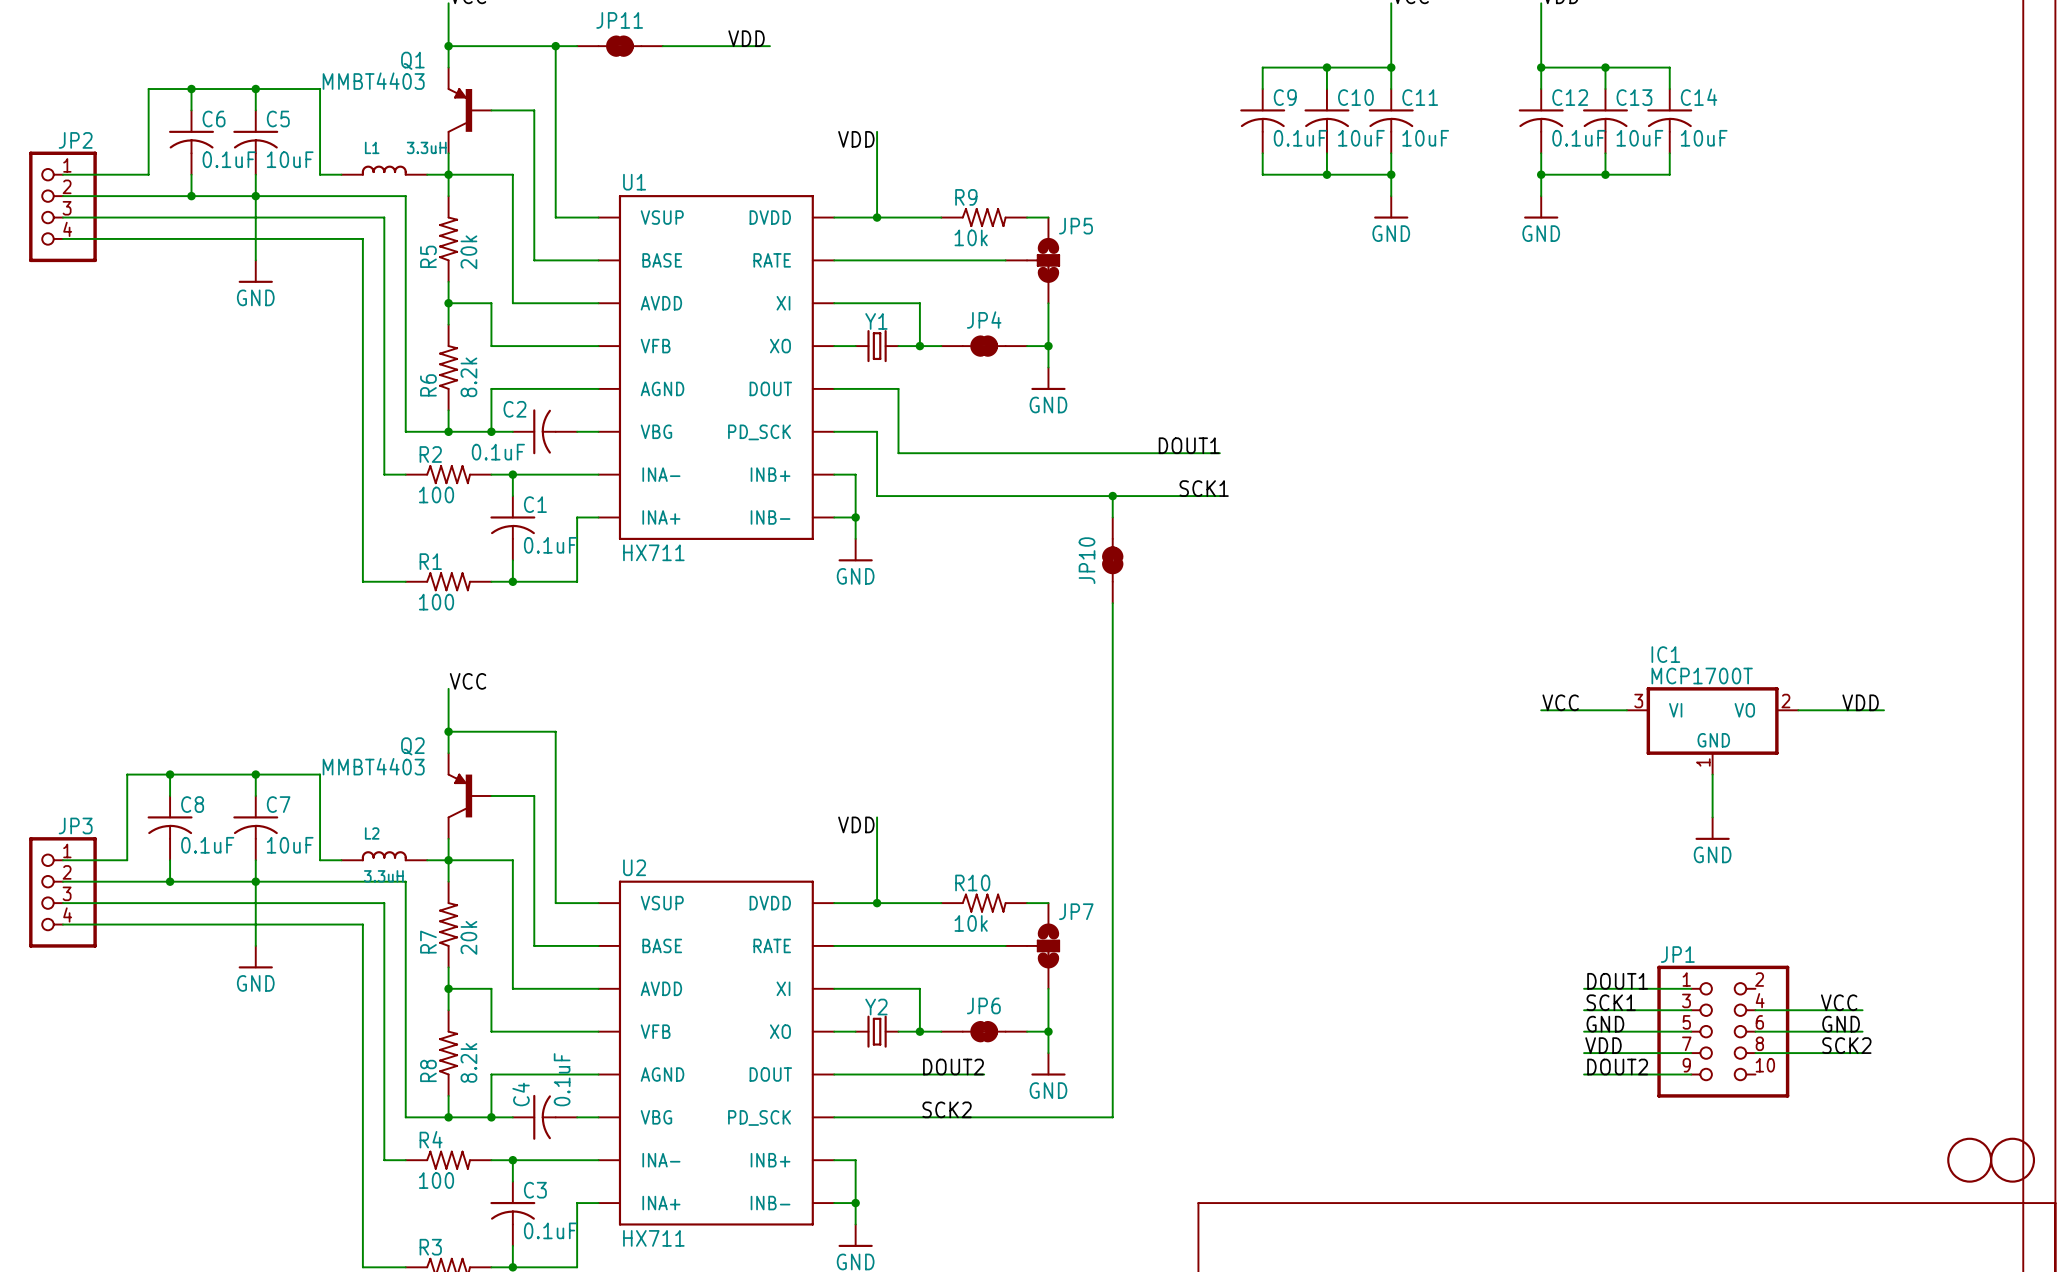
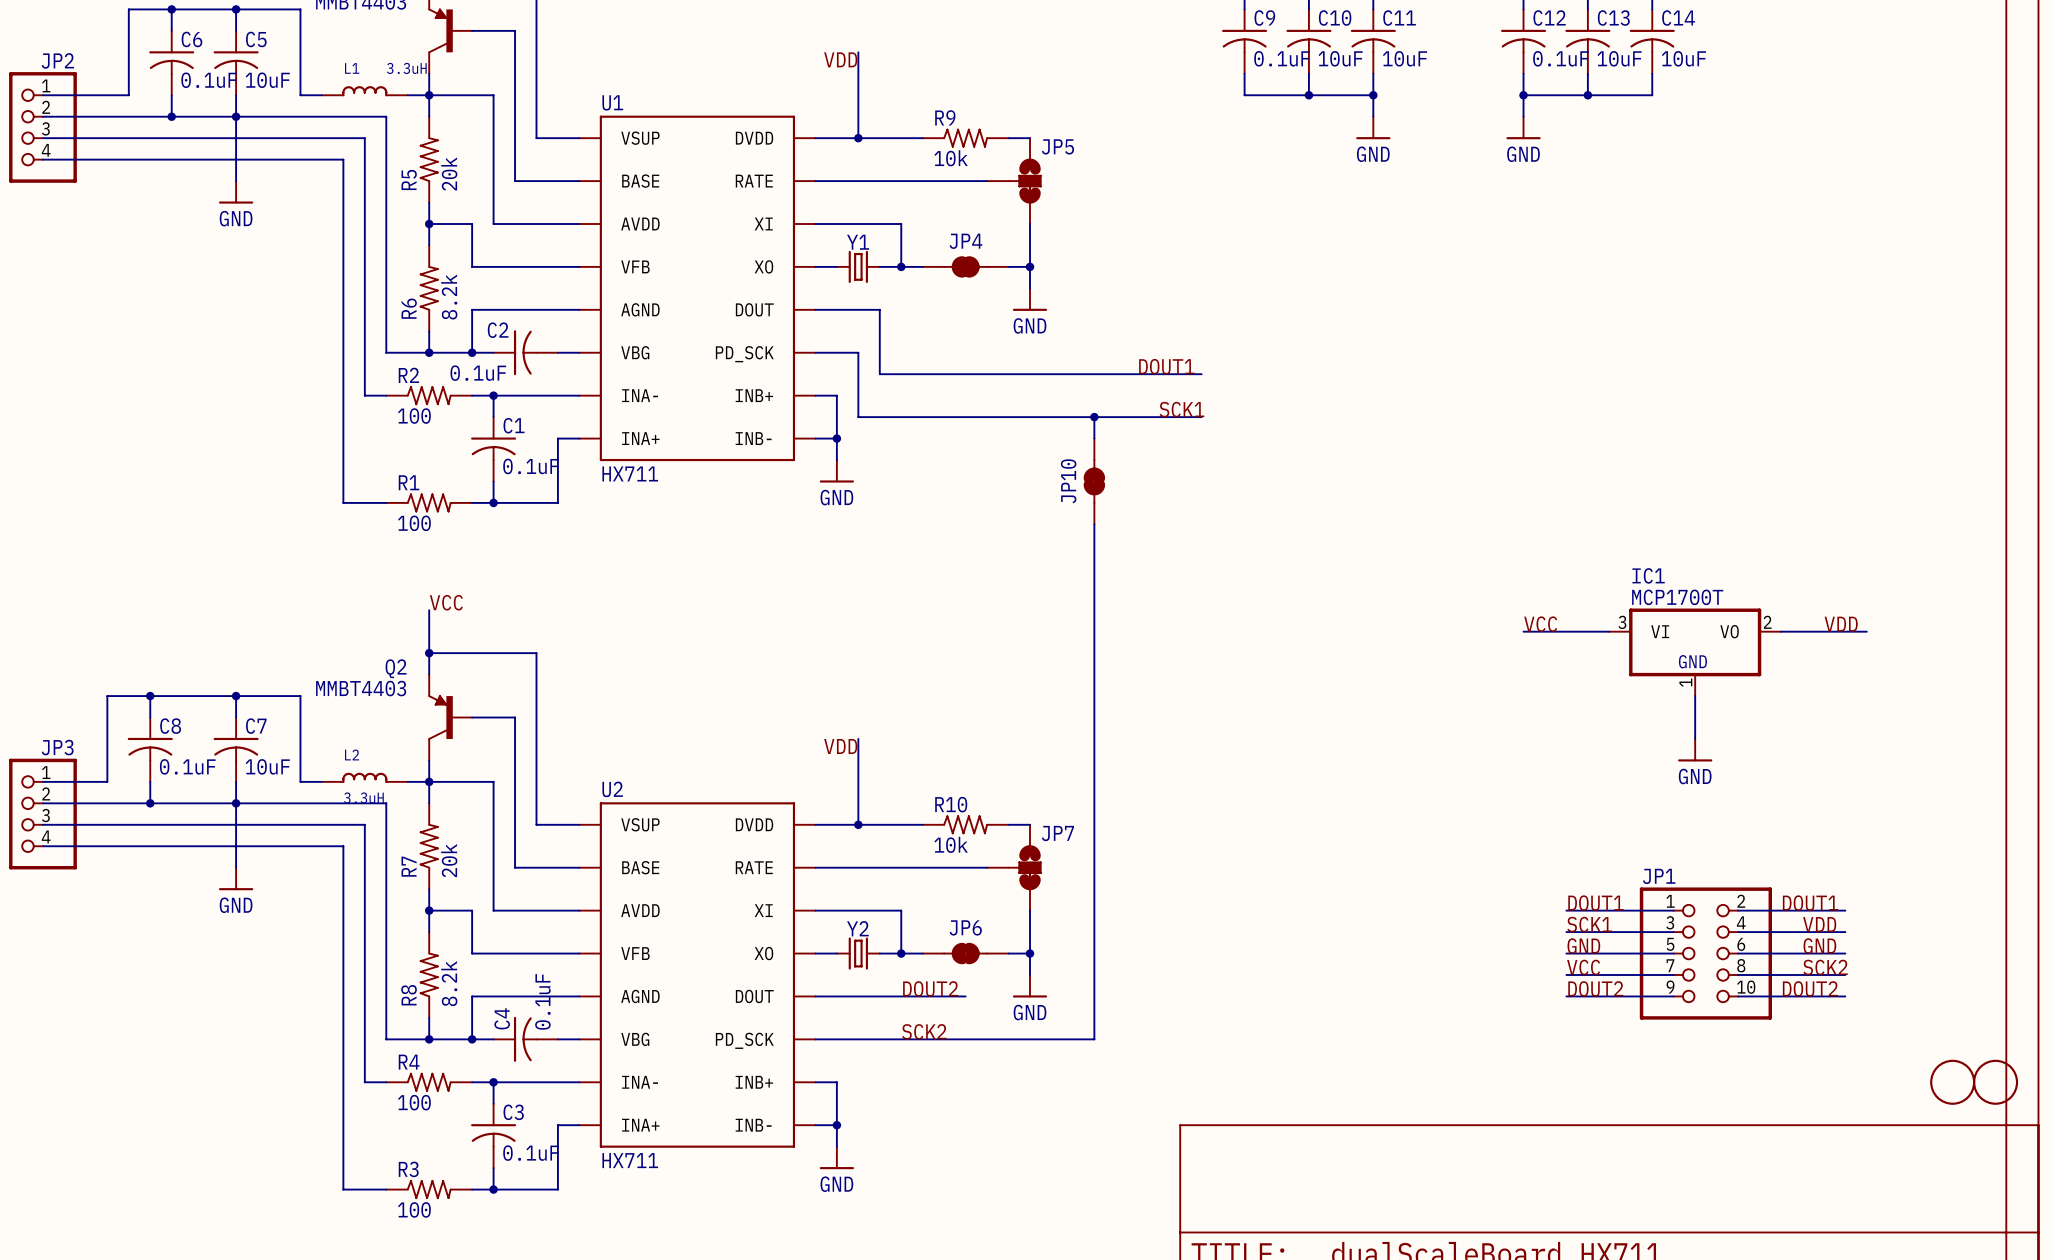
label: none -> DOUT1 (1810, 903)
wire: none -> (1738, 910) (1845, 910)
label: VCC (1839, 1002) -> VDD (1819, 924)
label: VDD (1603, 1045) -> VCC (1583, 967)
label: none -> DOUT2 (1810, 988)
wire: none -> (1738, 996) (1845, 996)

